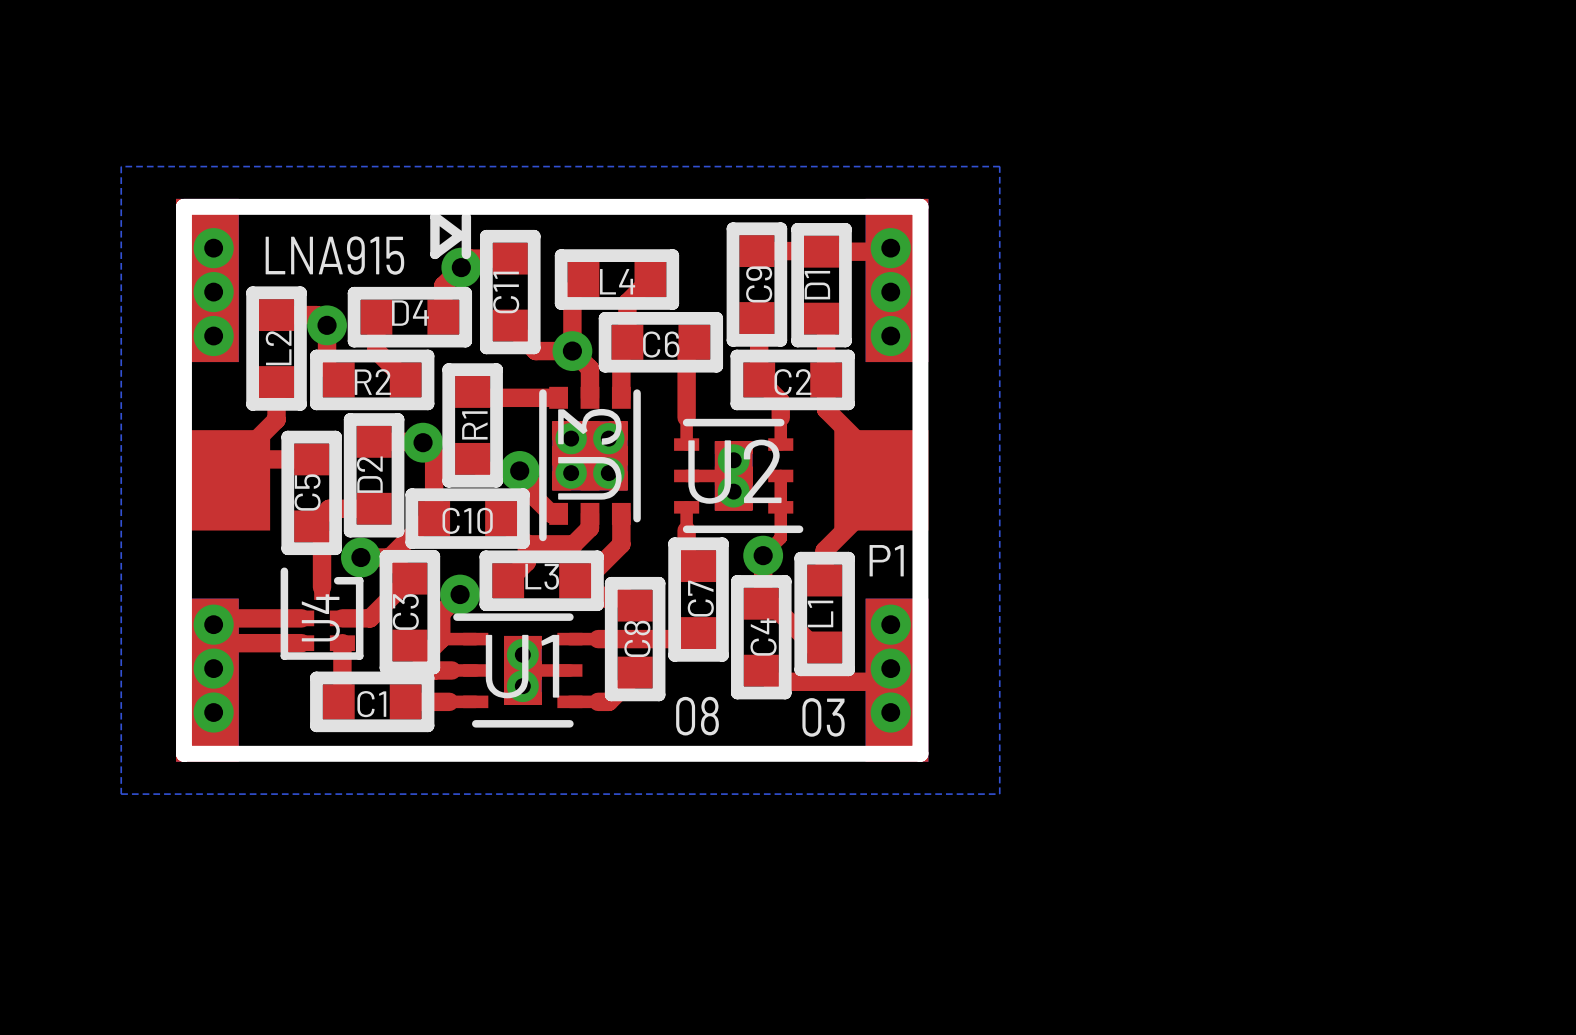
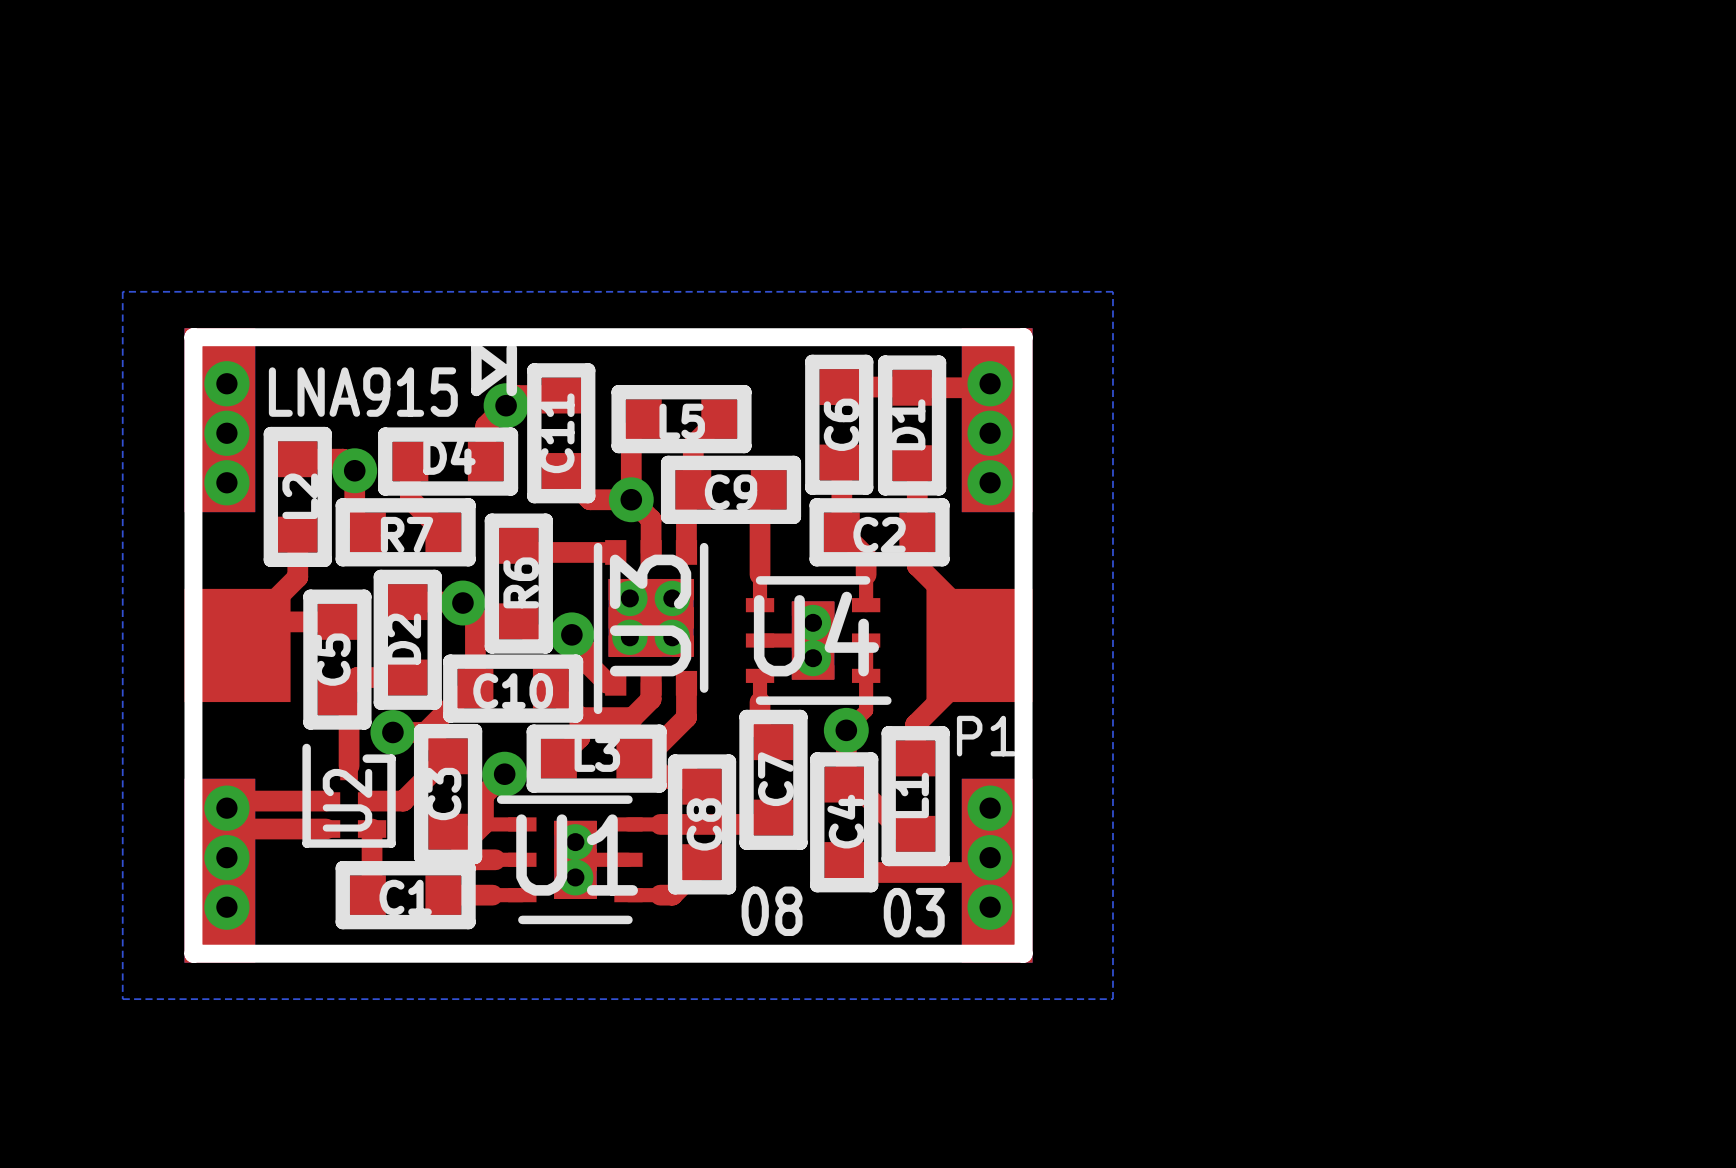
L4 name: L4 (617, 281) -> L5 (682, 421)
C9 name: C9 (759, 284) -> C6 (841, 424)
C6 name: C6 (661, 344) -> C9 (731, 492)
R2 name: R2 (372, 382) -> R7 (407, 534)
R1 name: R1 (474, 425) -> R6 (521, 582)
U2 name: U2 (734, 471) -> U4 (816, 634)
U4 name: U4 (320, 617) -> U2 (347, 800)

